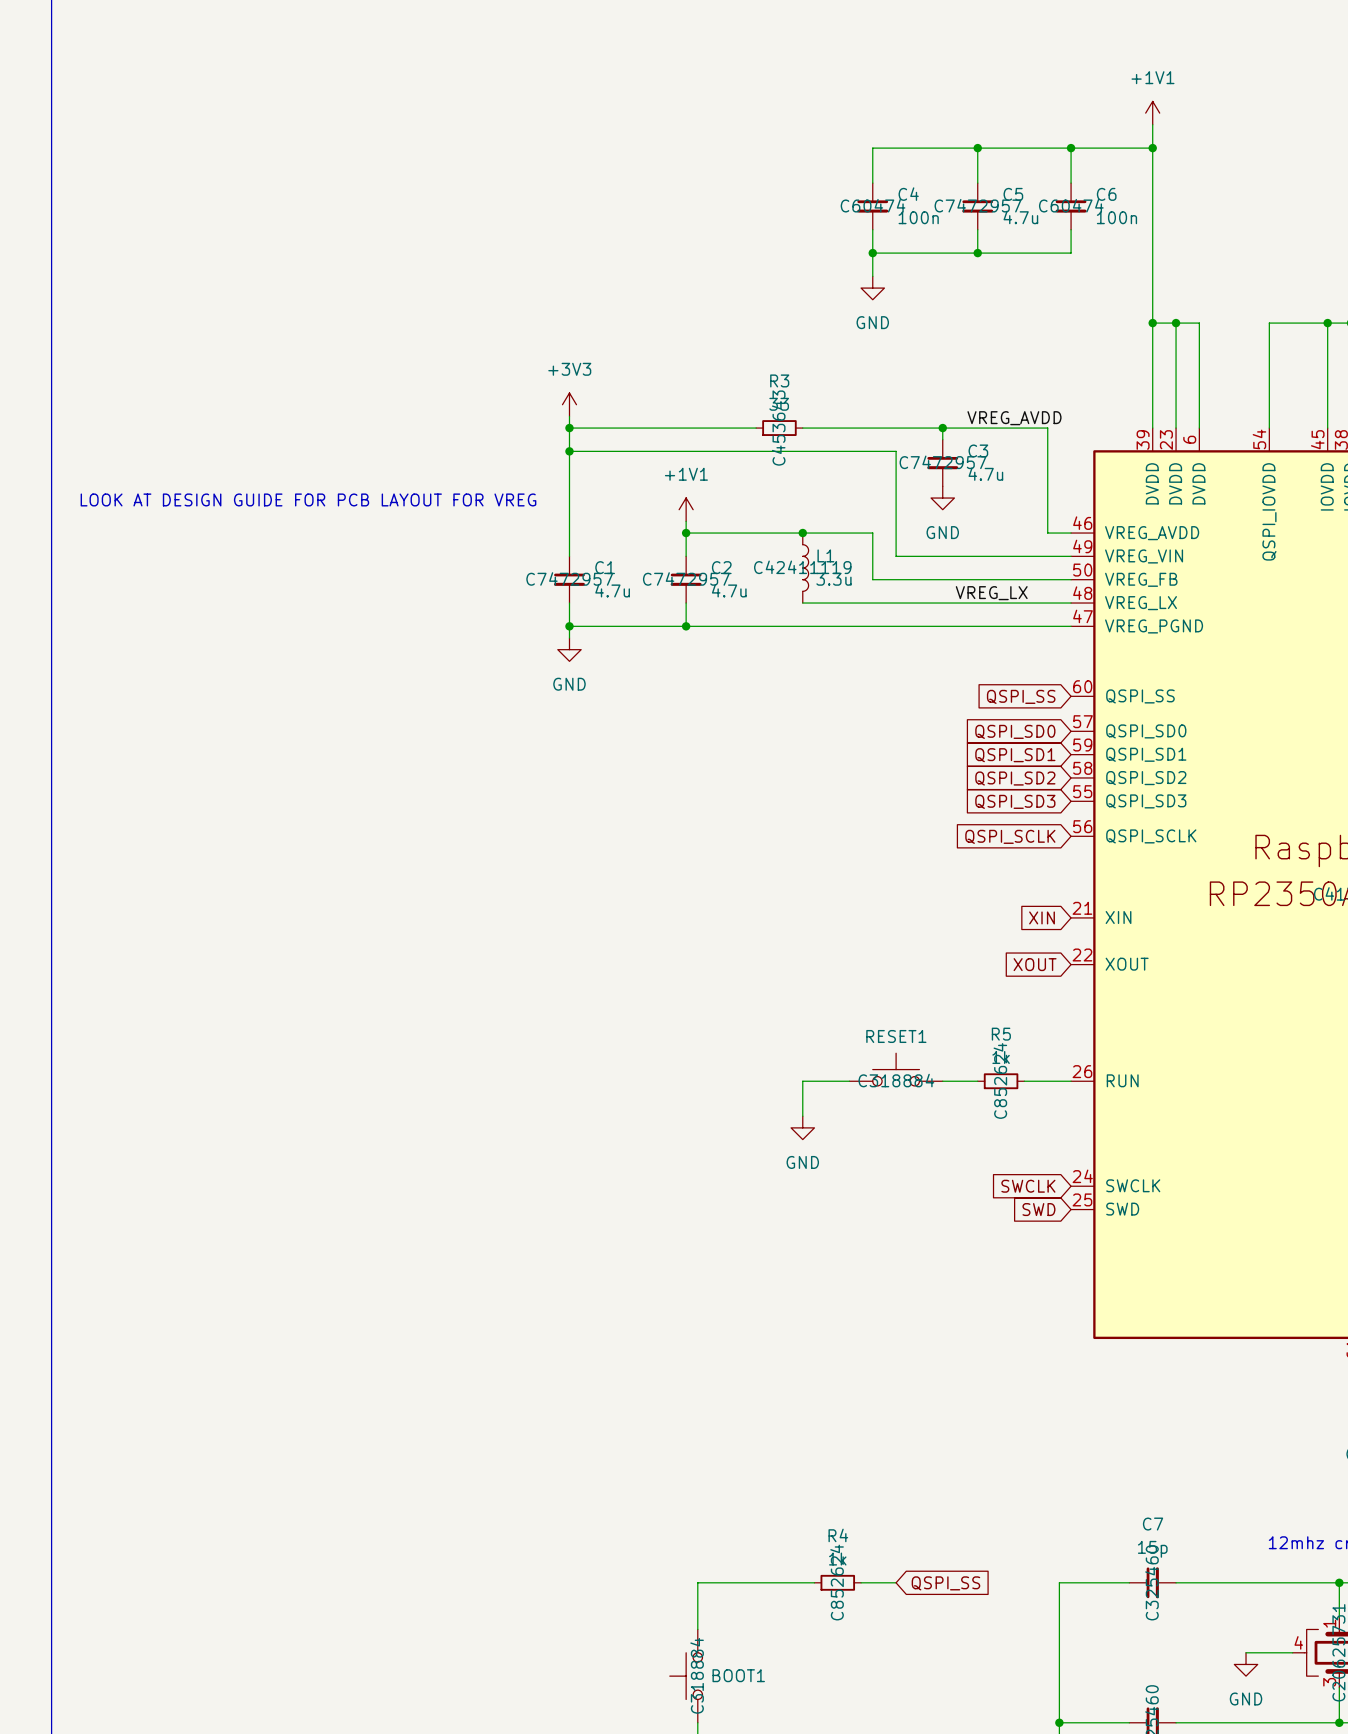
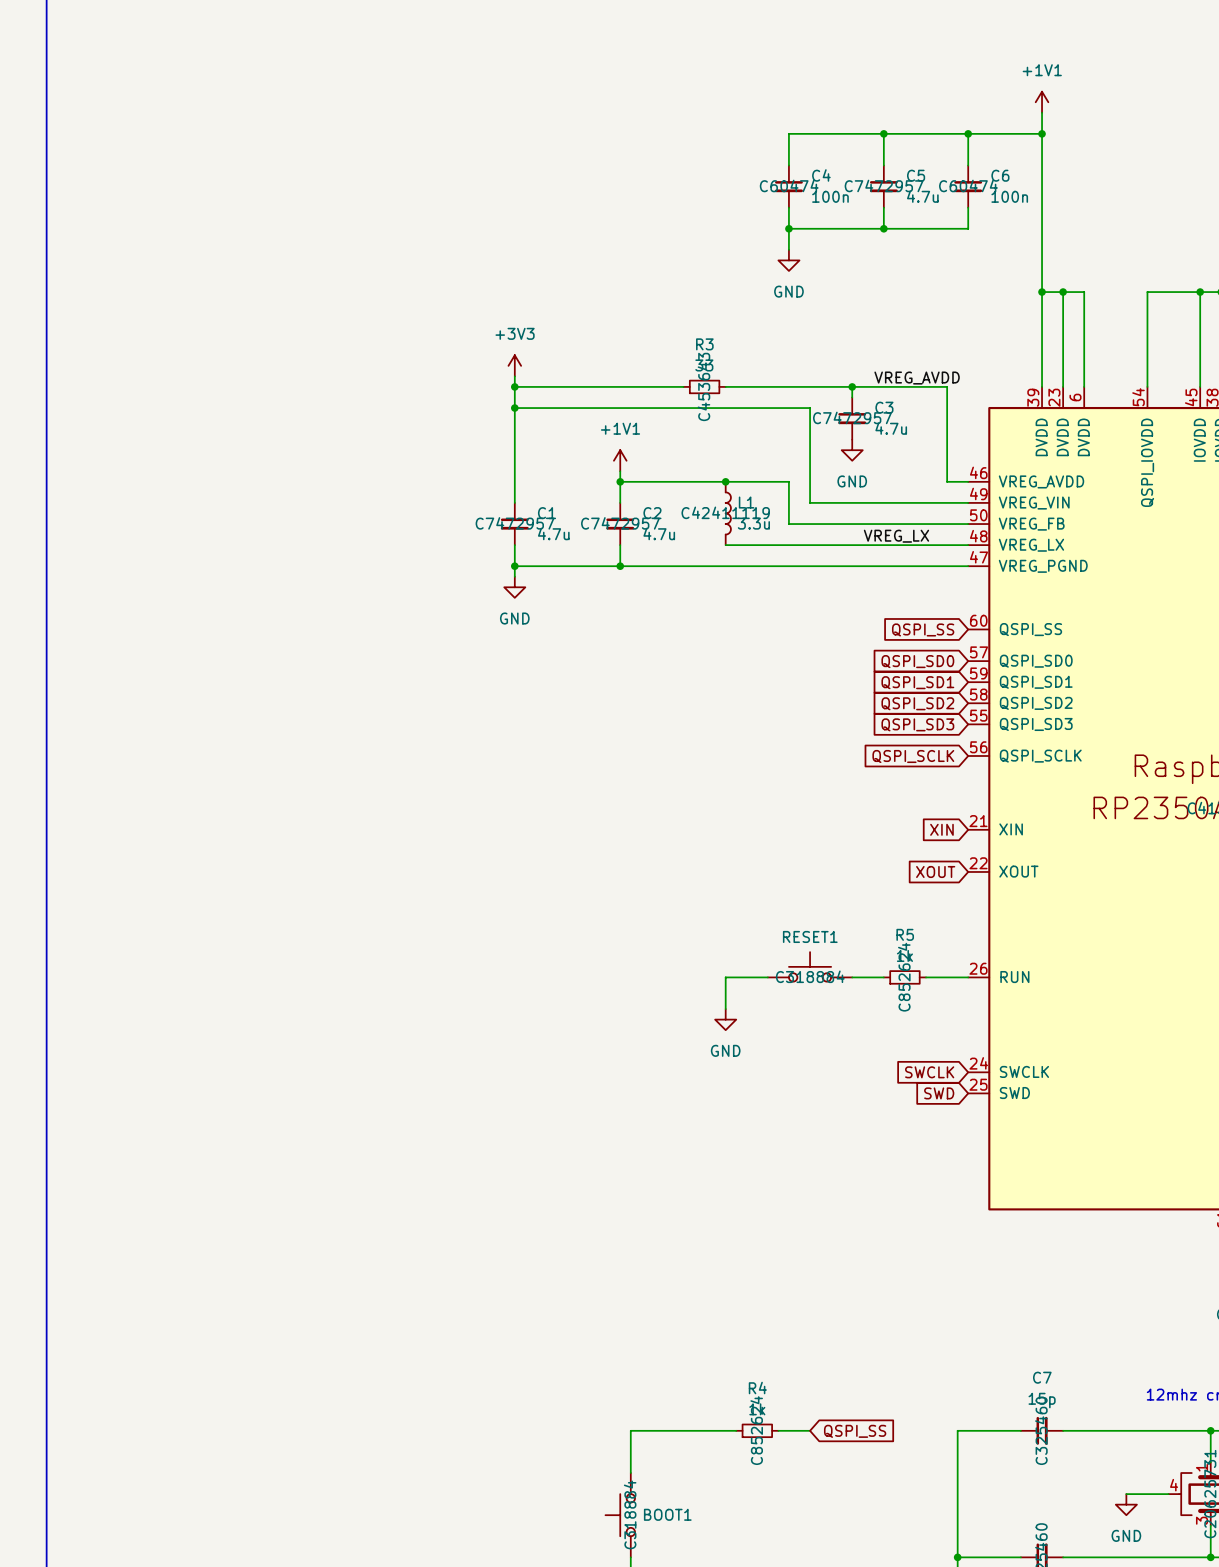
text: LOOK AT DESIGN GUIDE FOR PCB LAYOUT FOR VREG (308, 499) -> none

